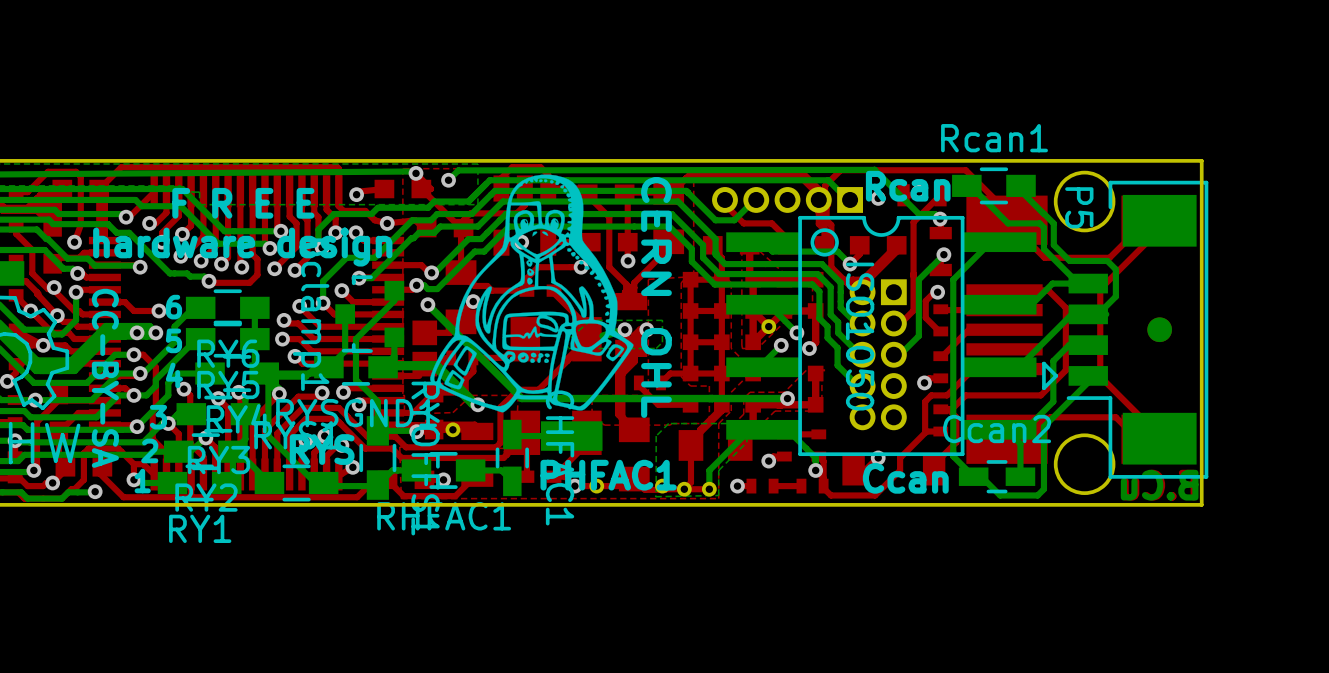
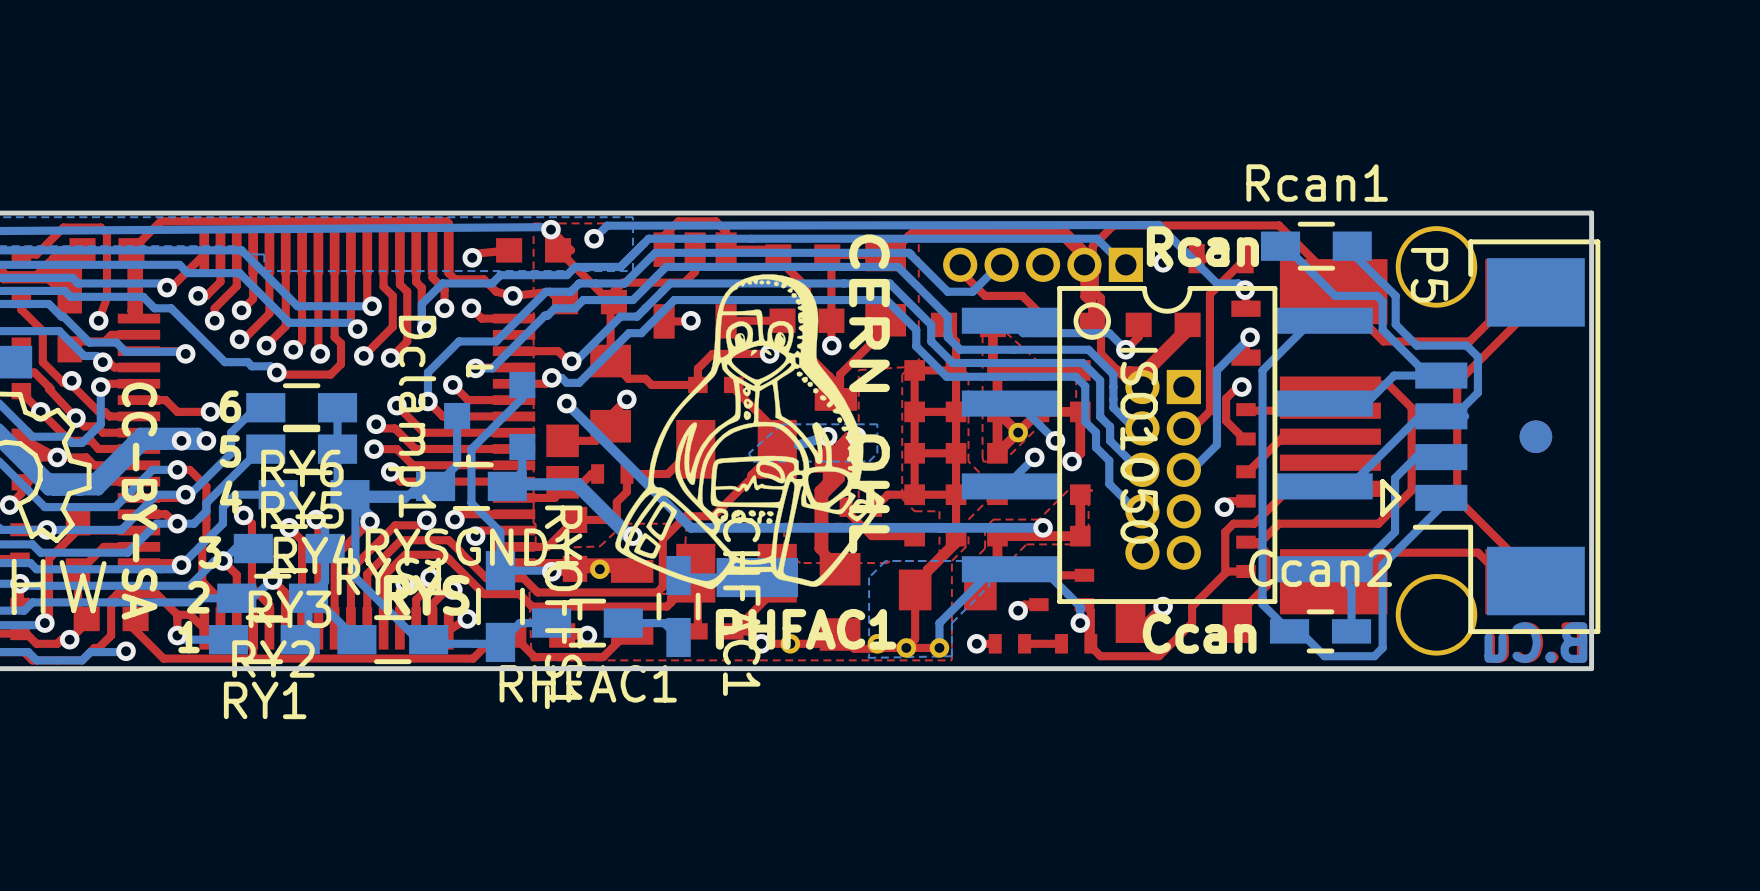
text: F R E E (243, 203) -> none
text: hardware design (242, 247) -> none
drawing position: (531, 293) -> (749, 431)

